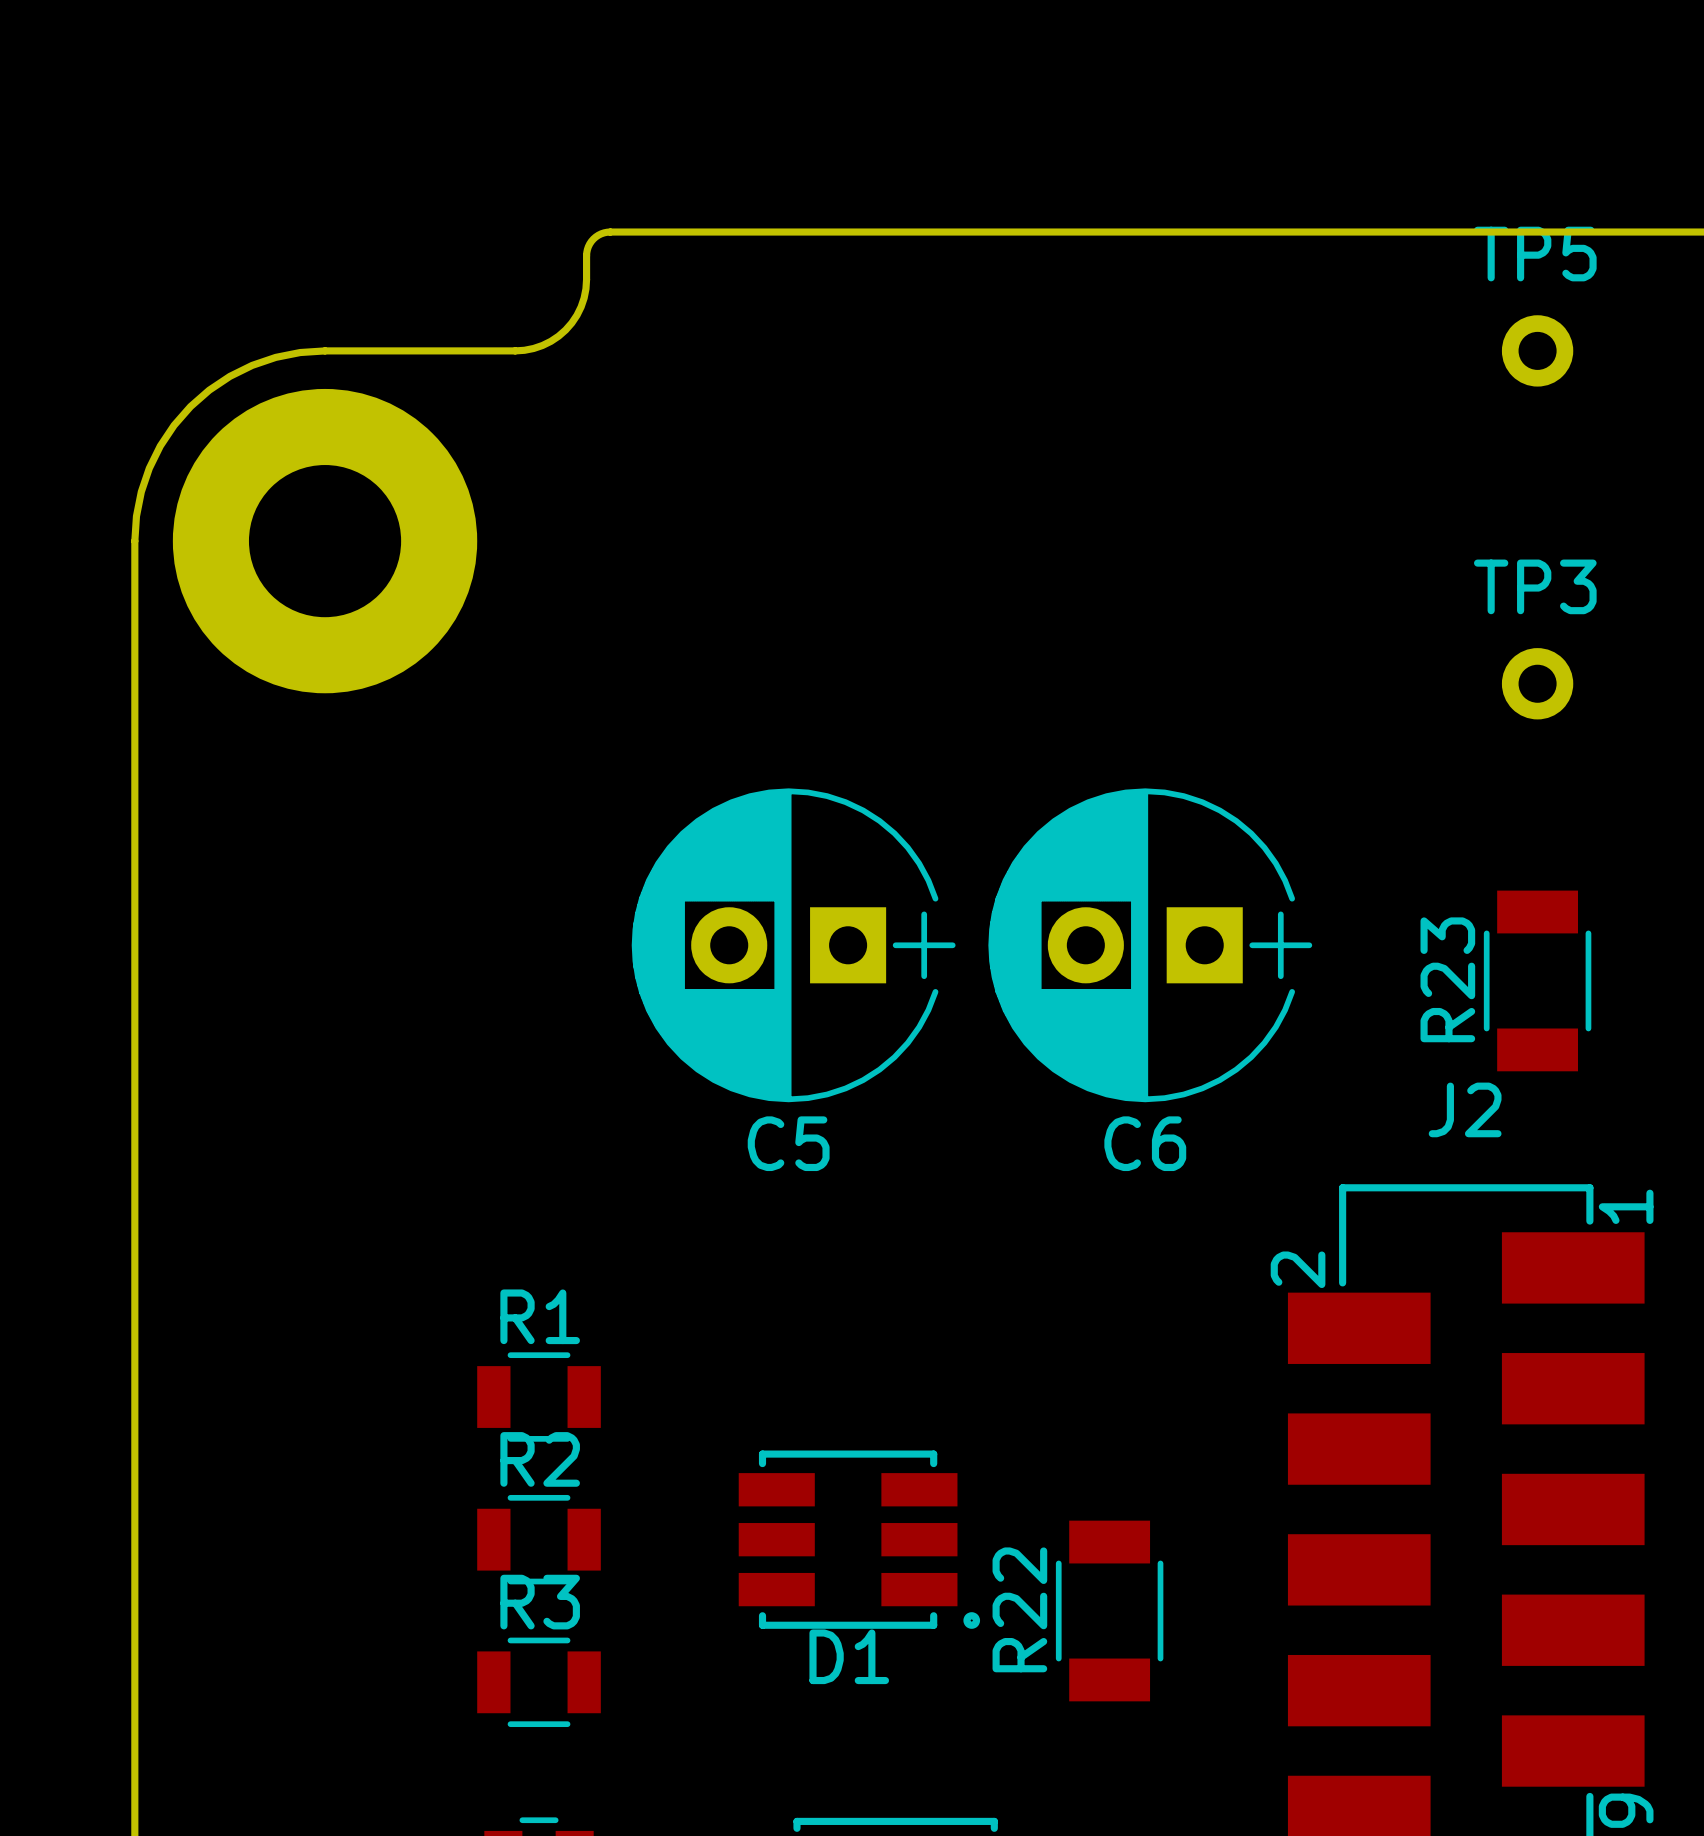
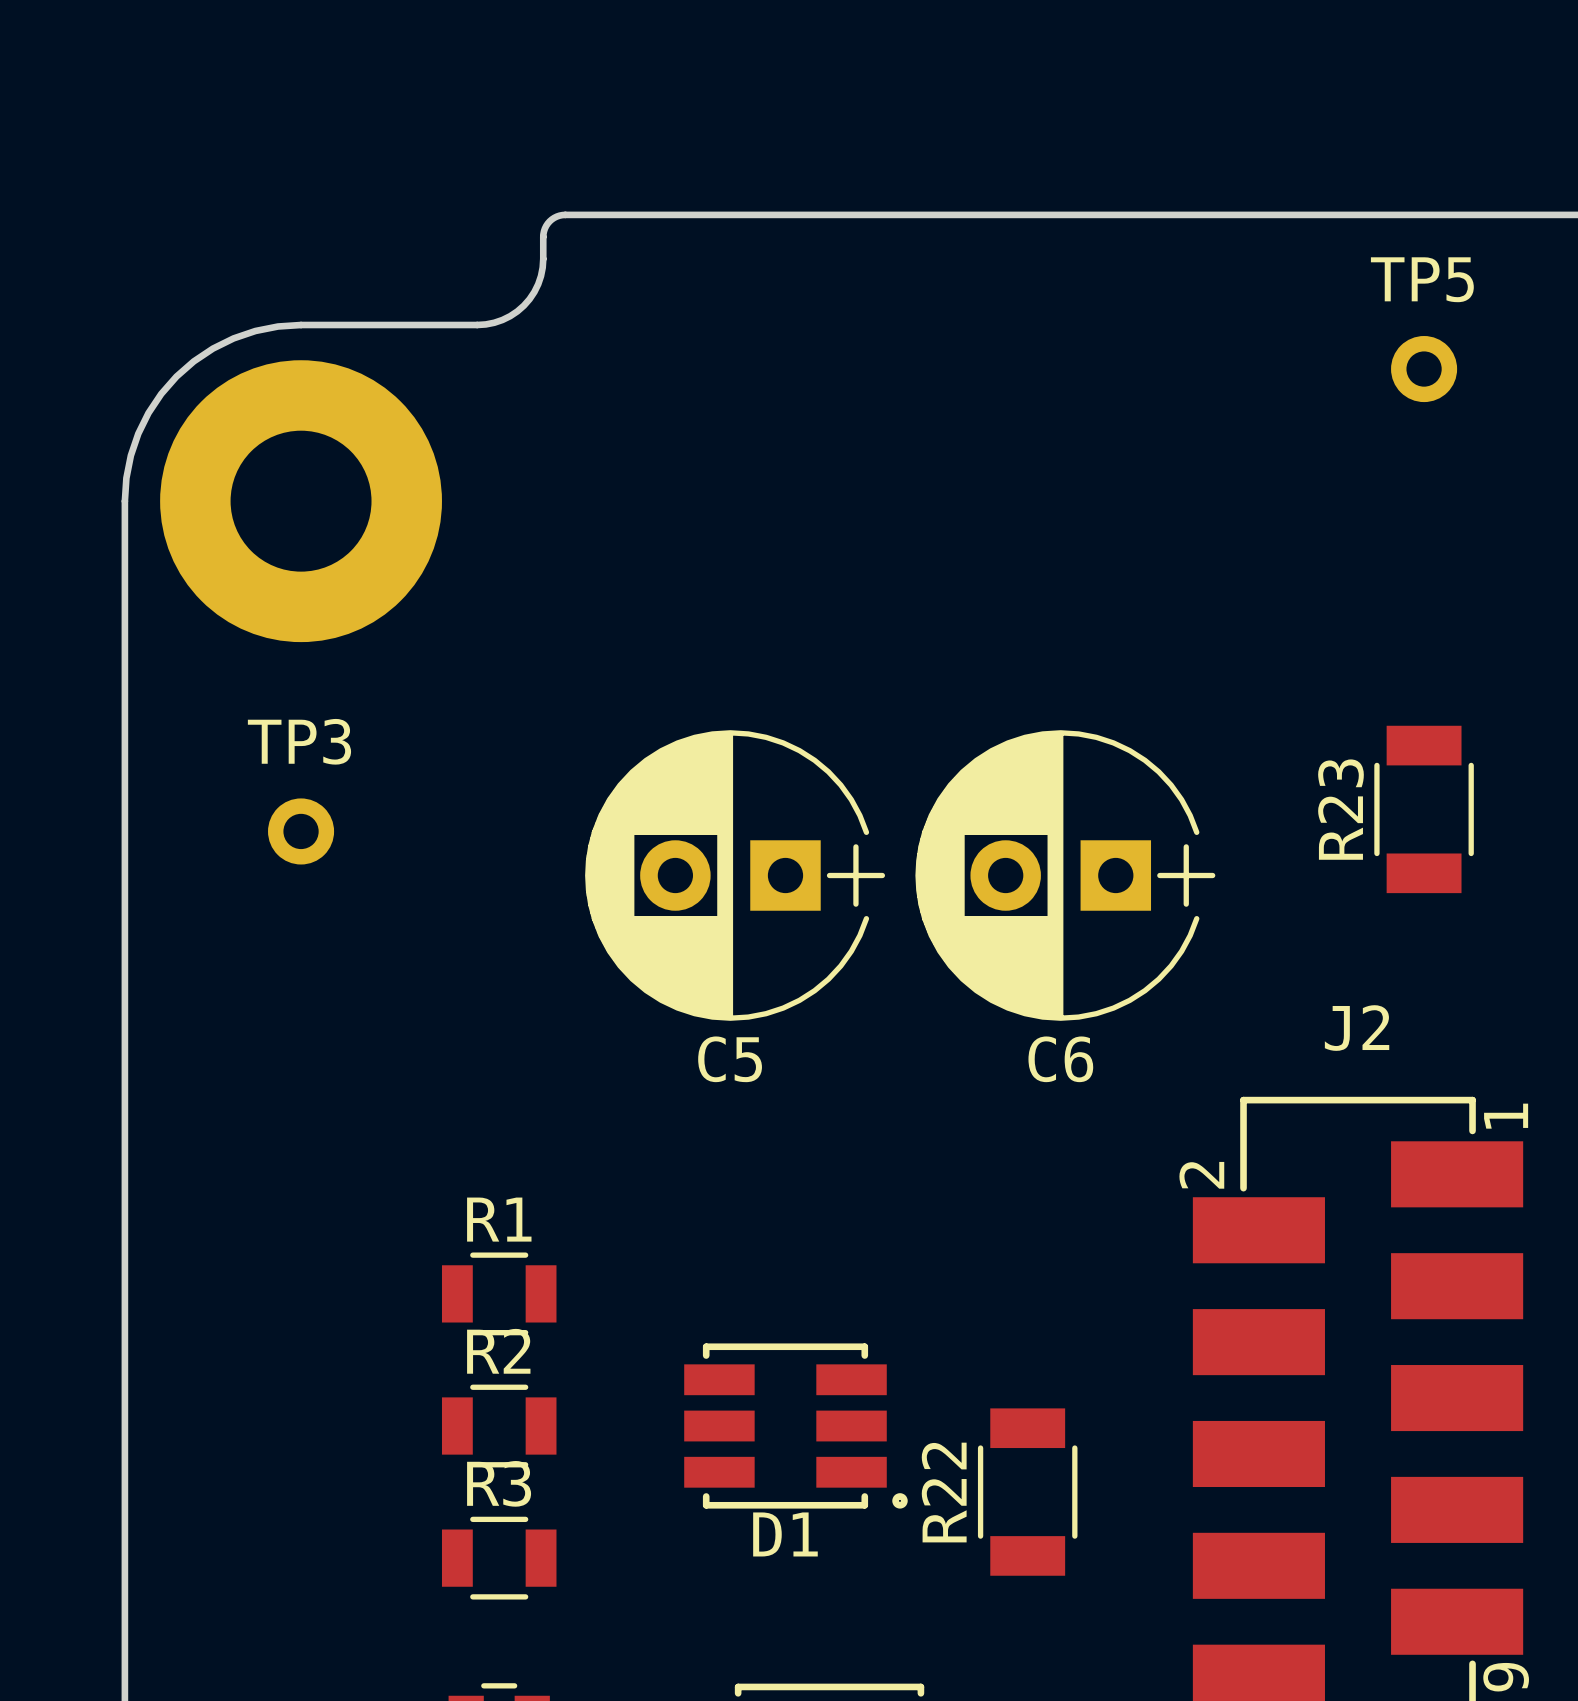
TP5 position: (1537, 350) -> (1424, 369)
TP3 position: (1537, 683) -> (301, 831)
R23 position: (1537, 980) -> (1424, 809)

